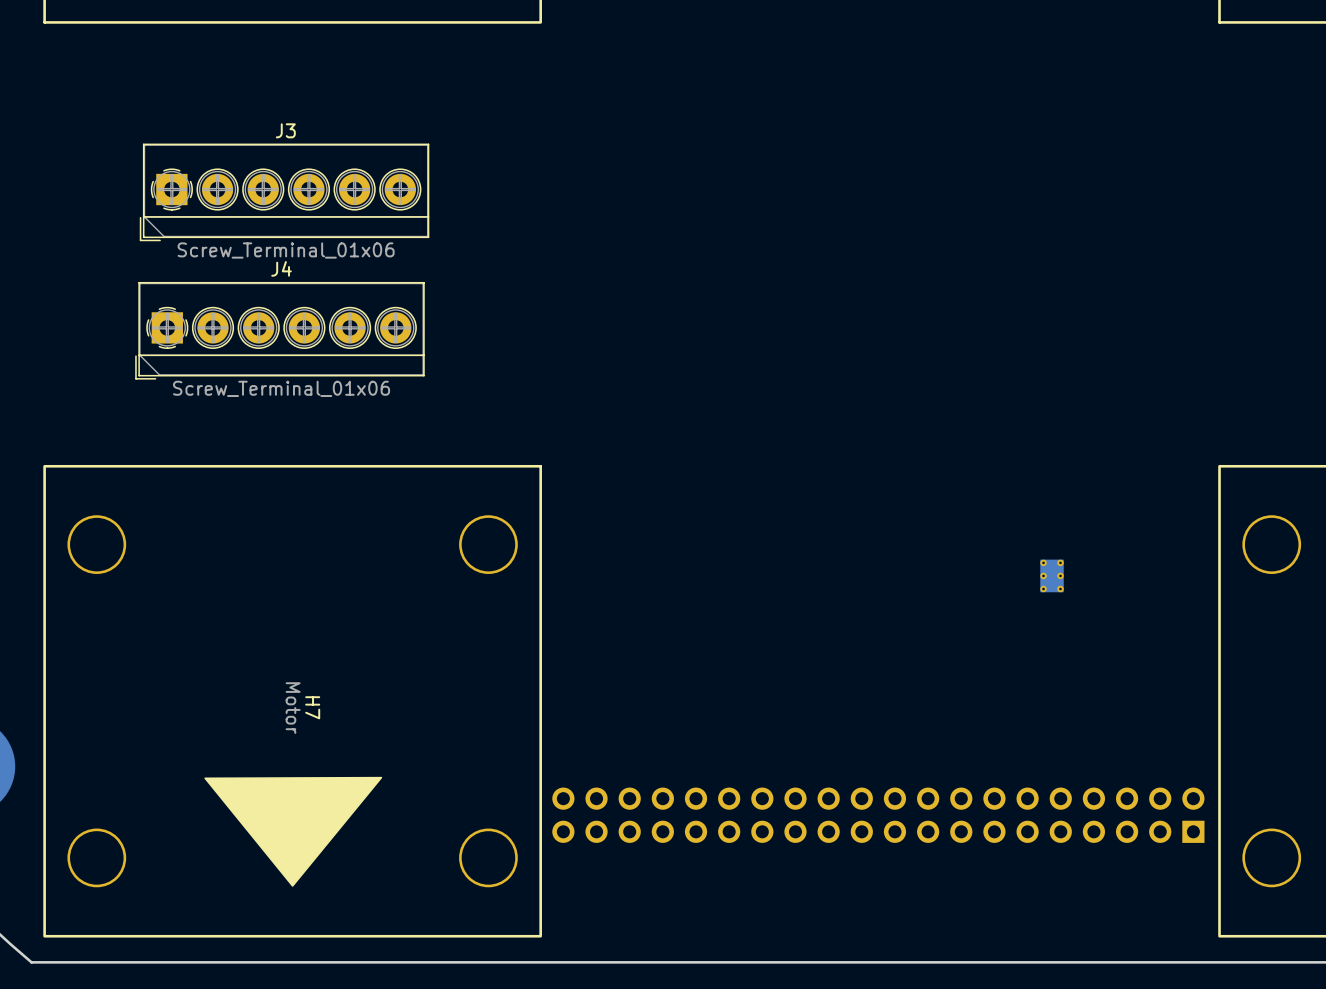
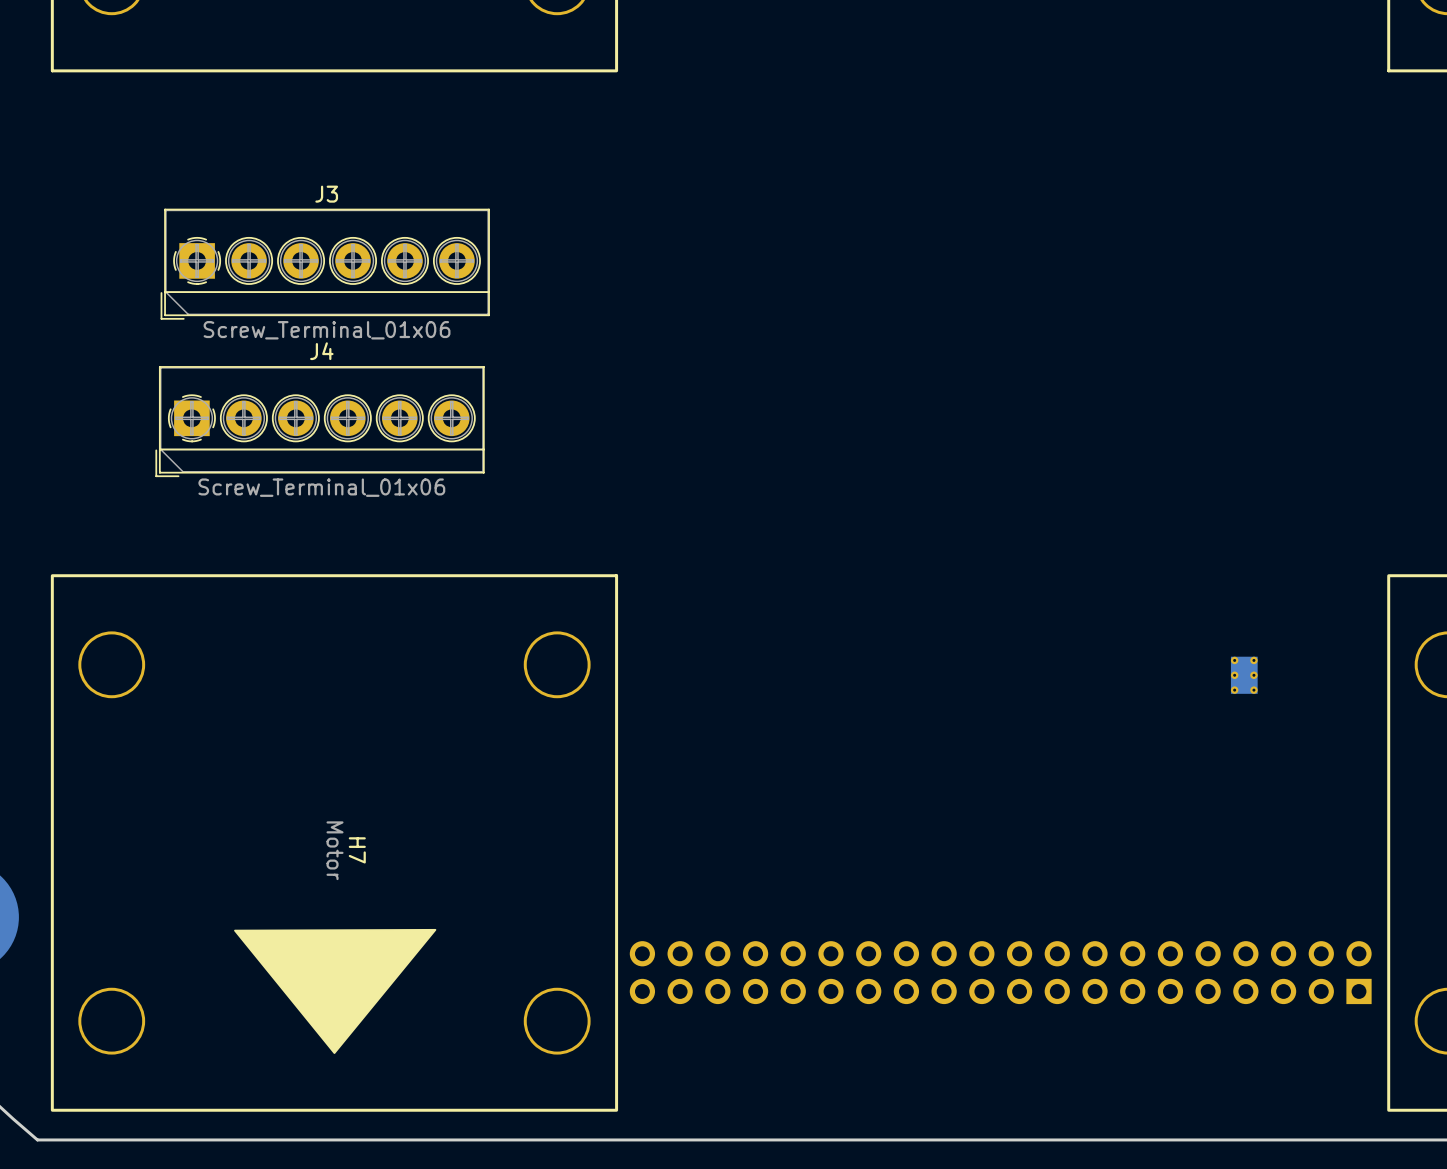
part position: (1052, 575) -> (1244, 675)

